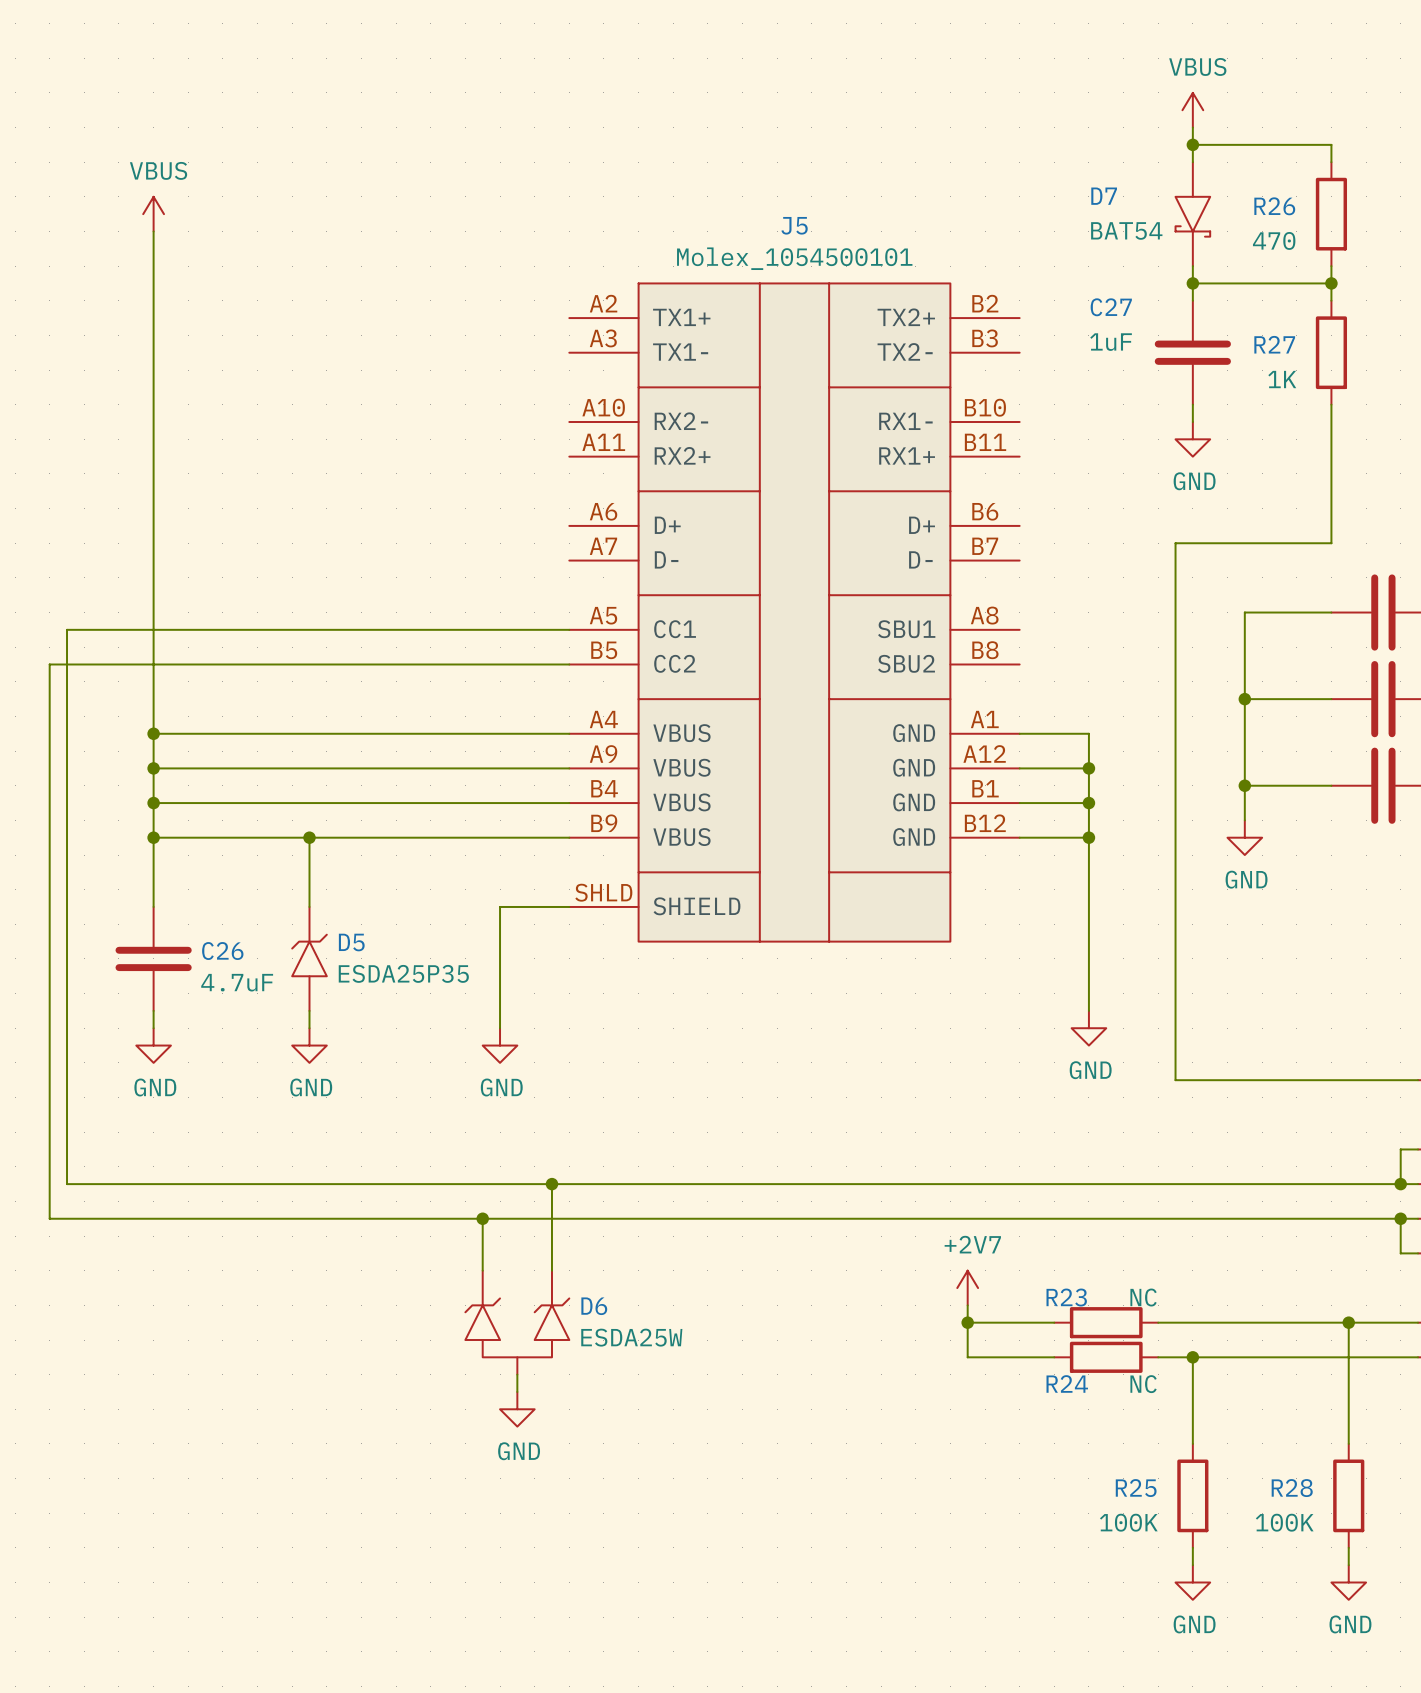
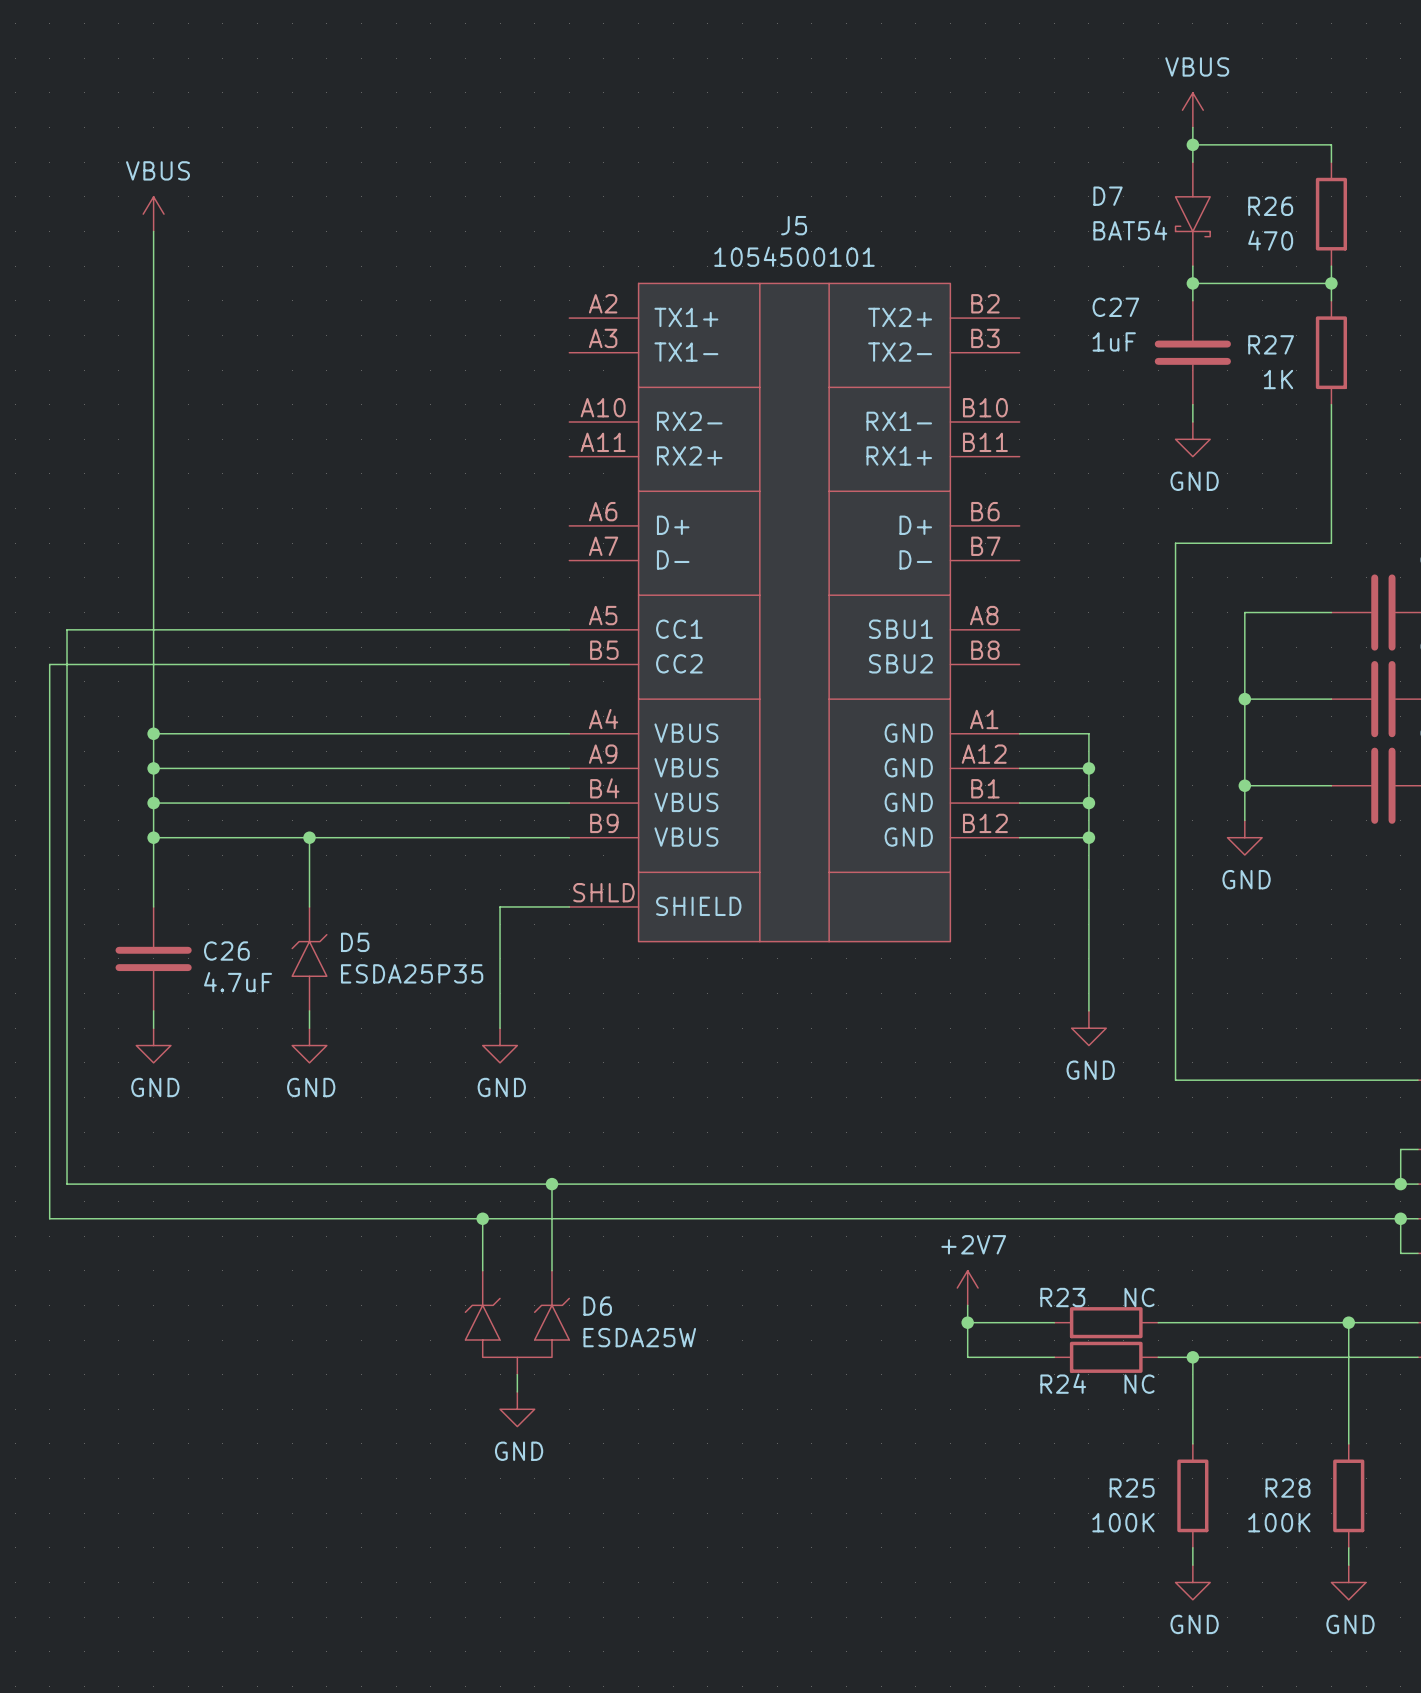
J5 value: Molex_1054500101 (794, 258) -> 1054500101 (794, 256)

